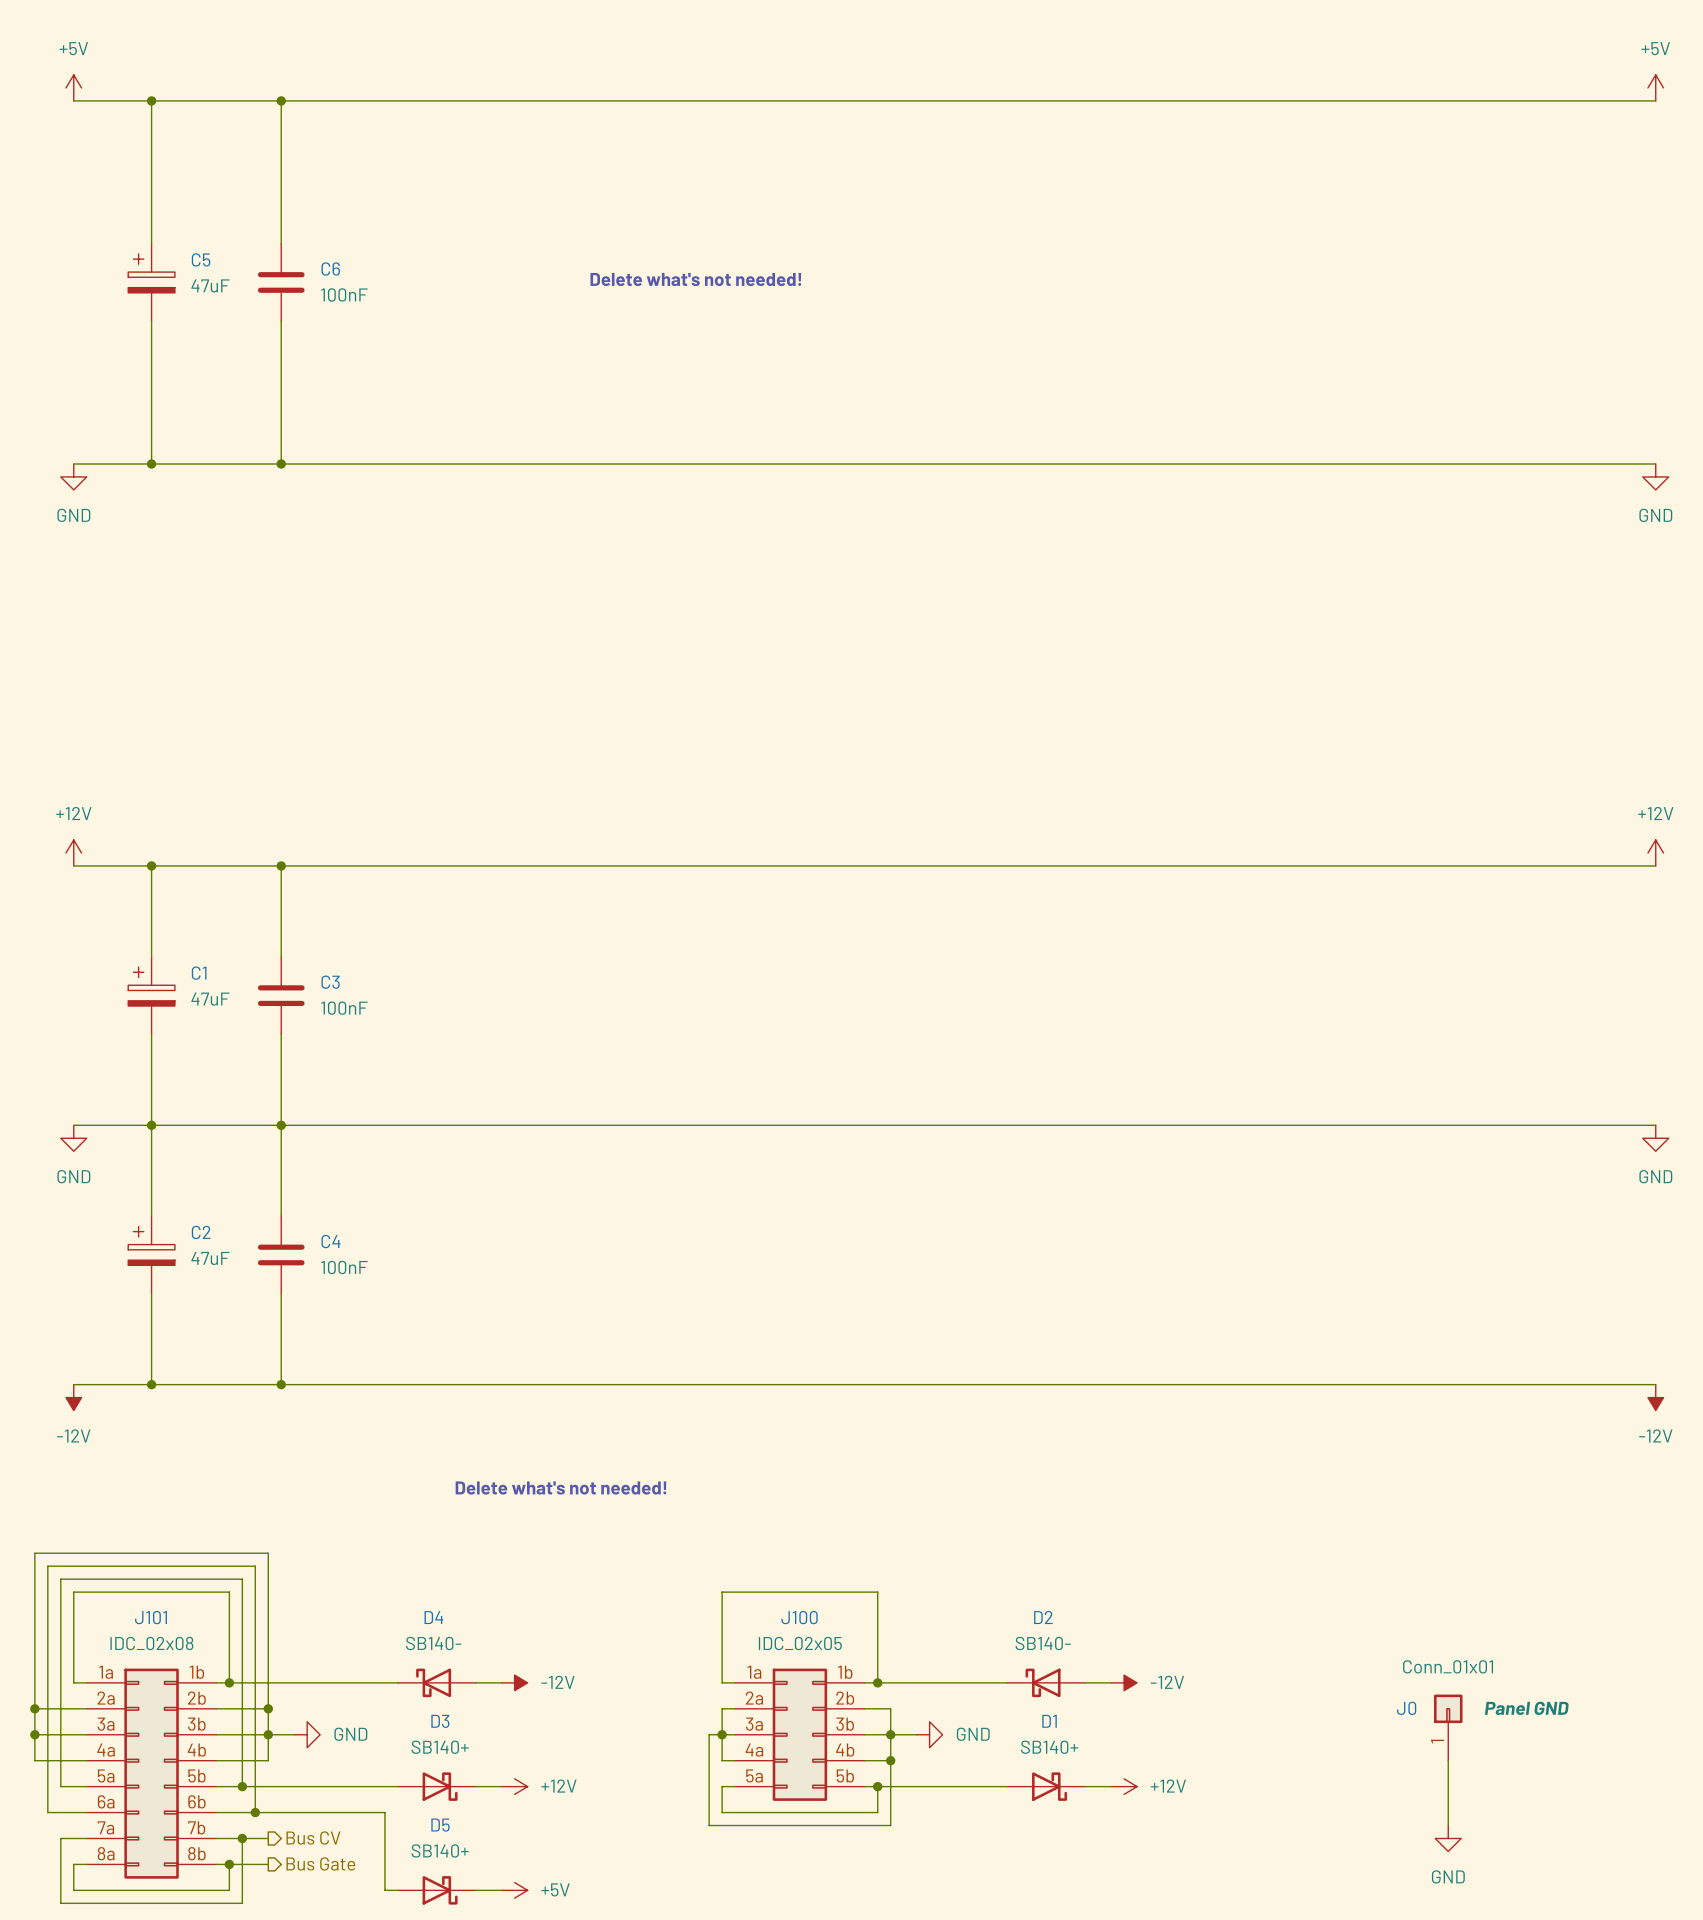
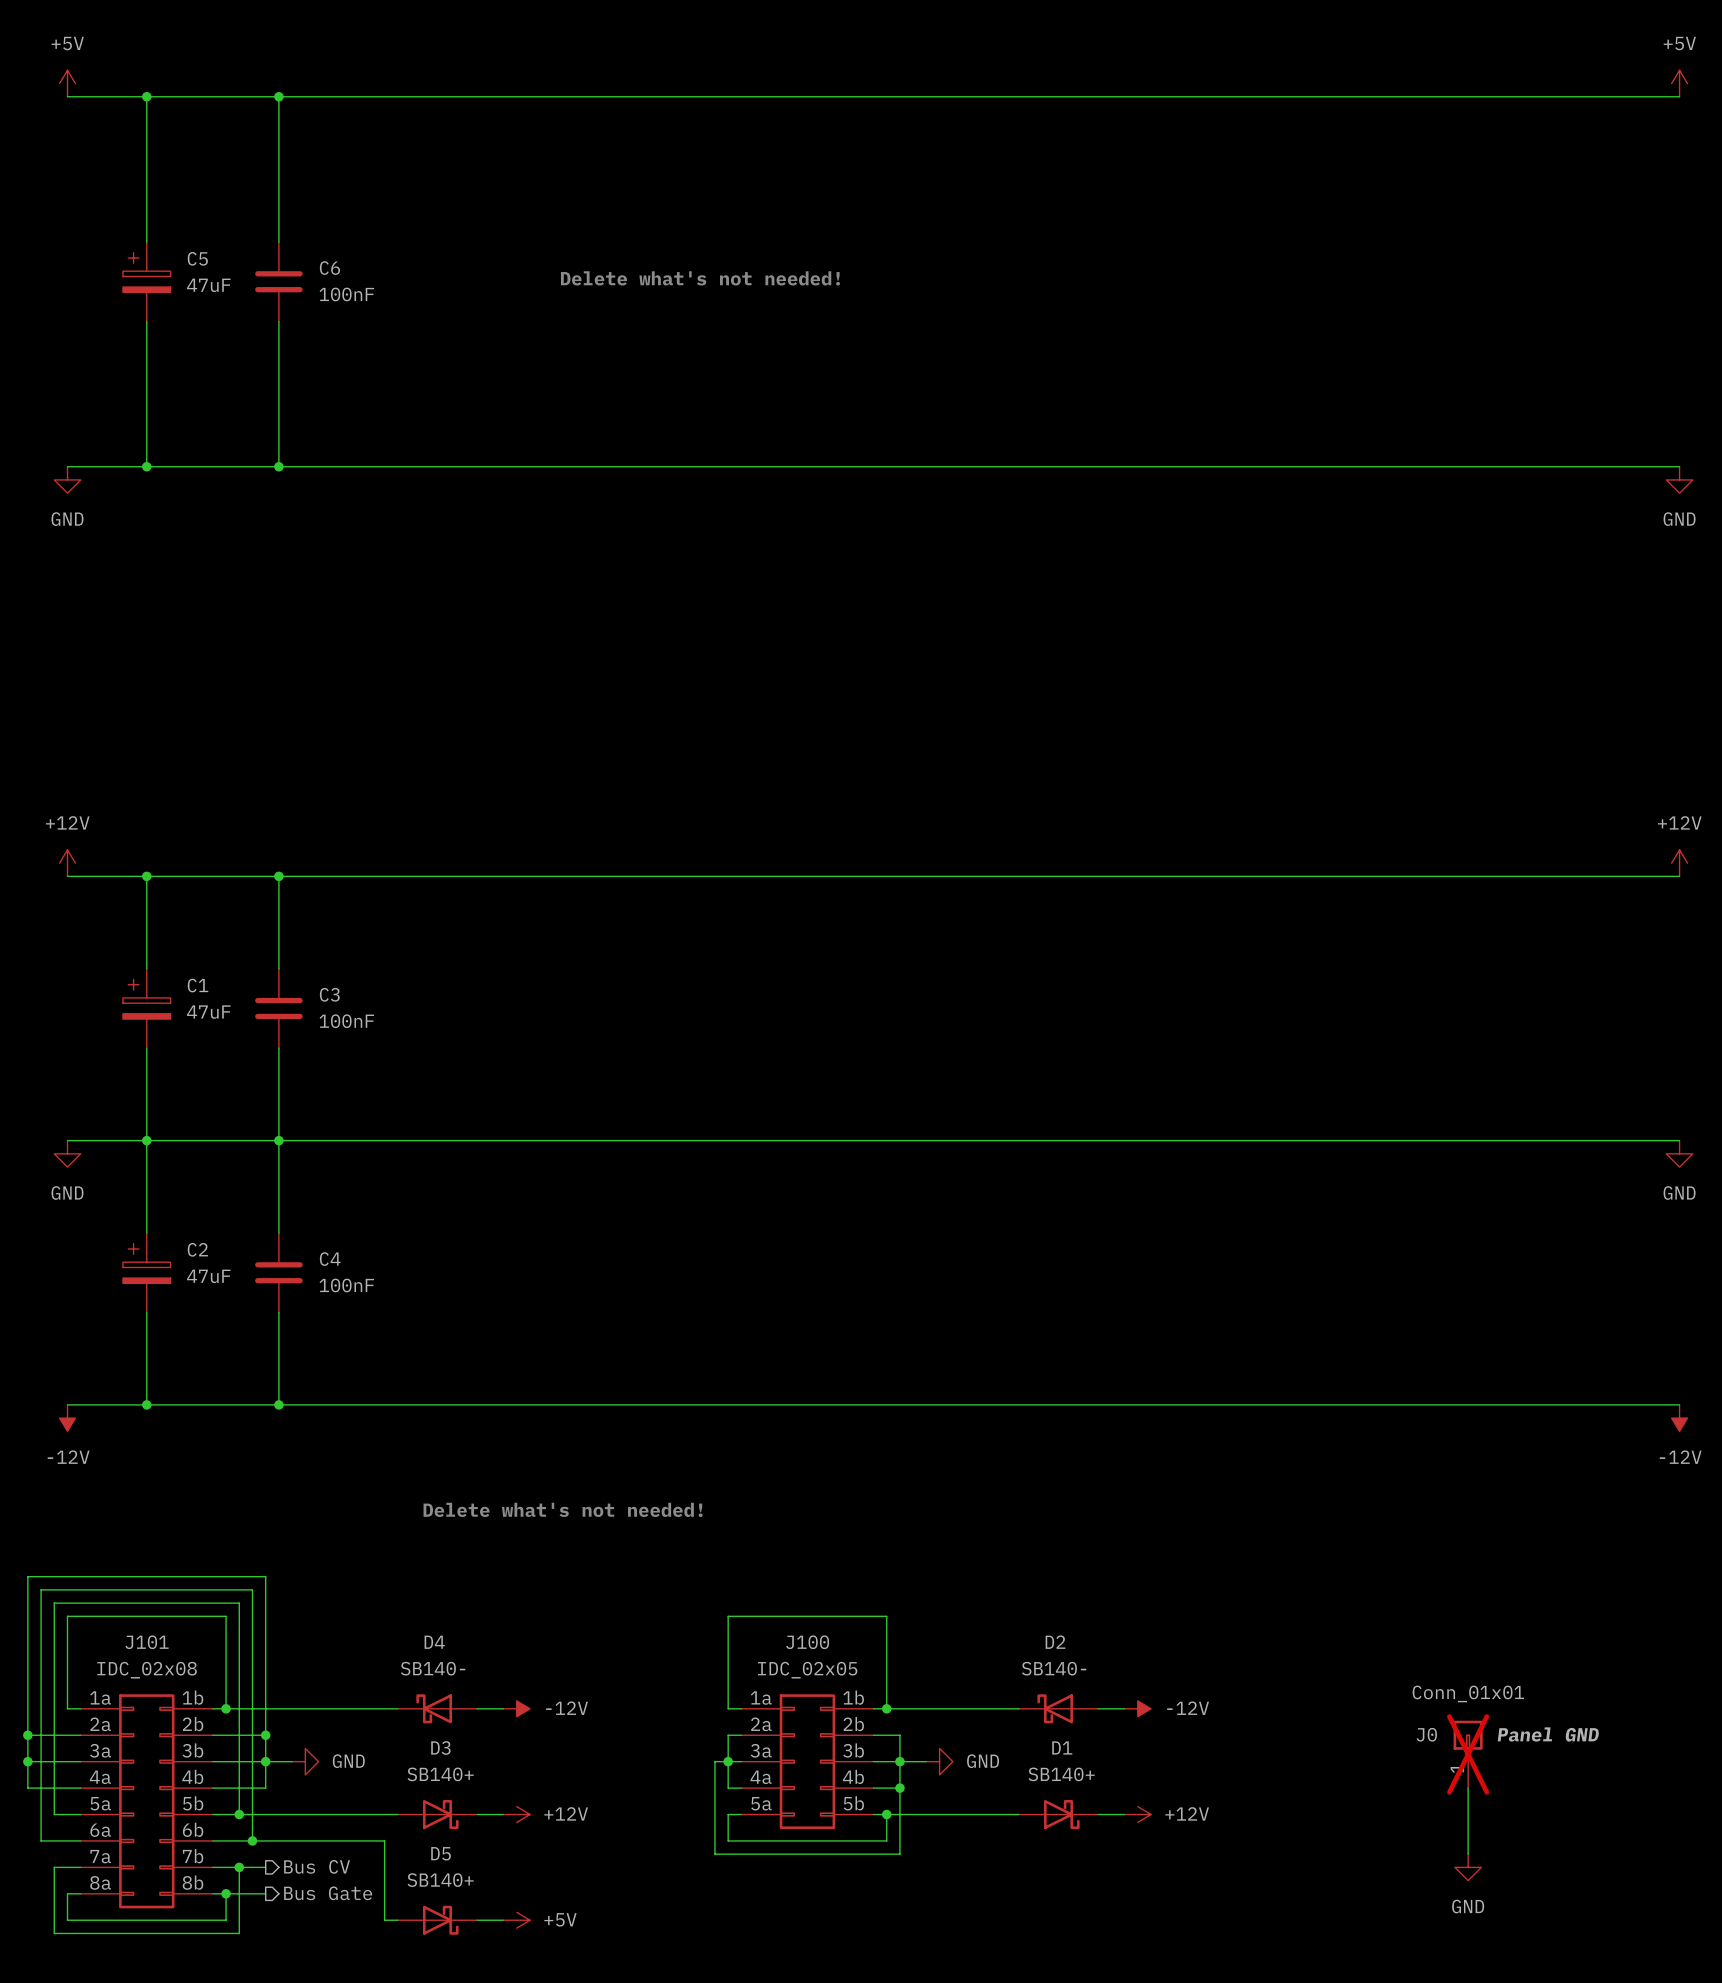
J0 do-not-place cross: none -> (1468, 1754)

